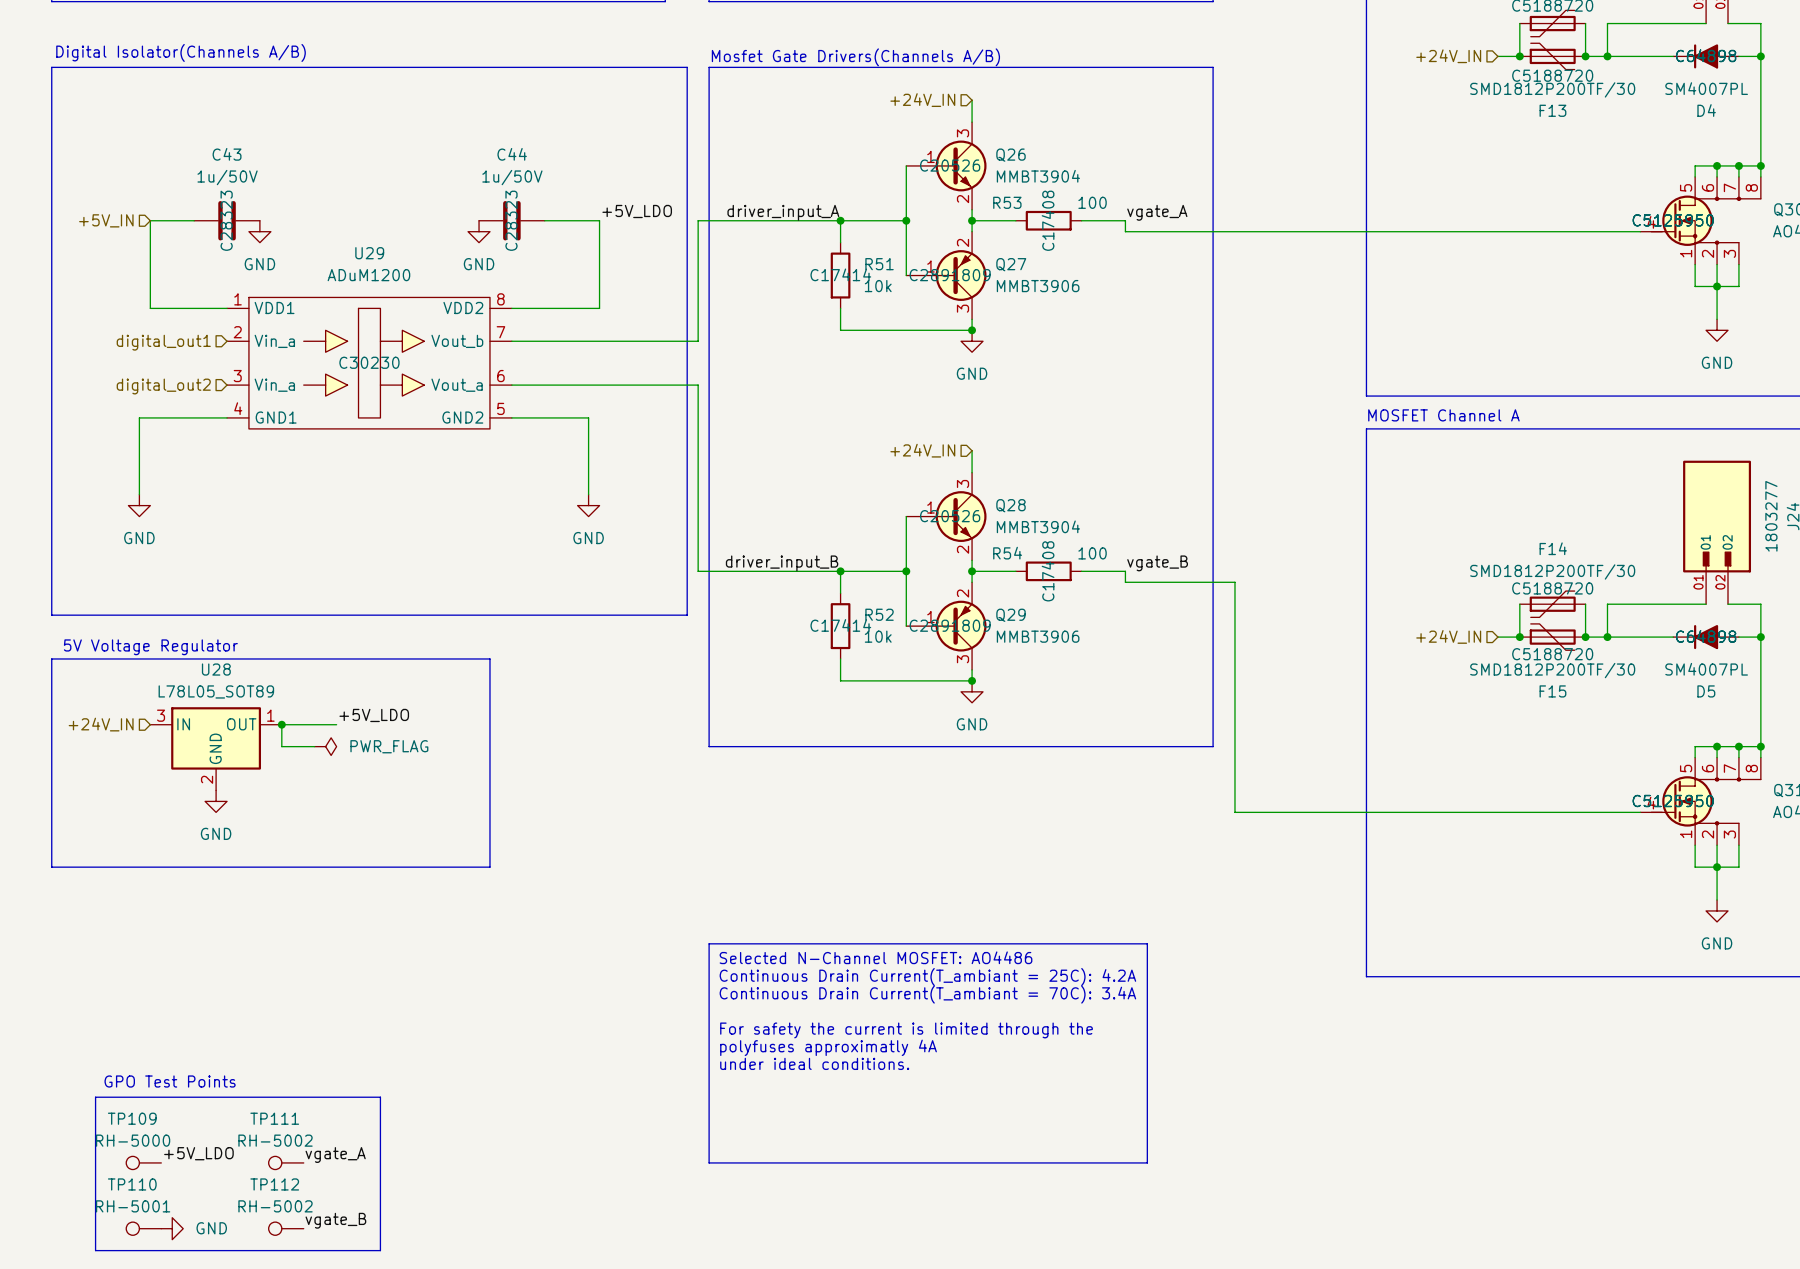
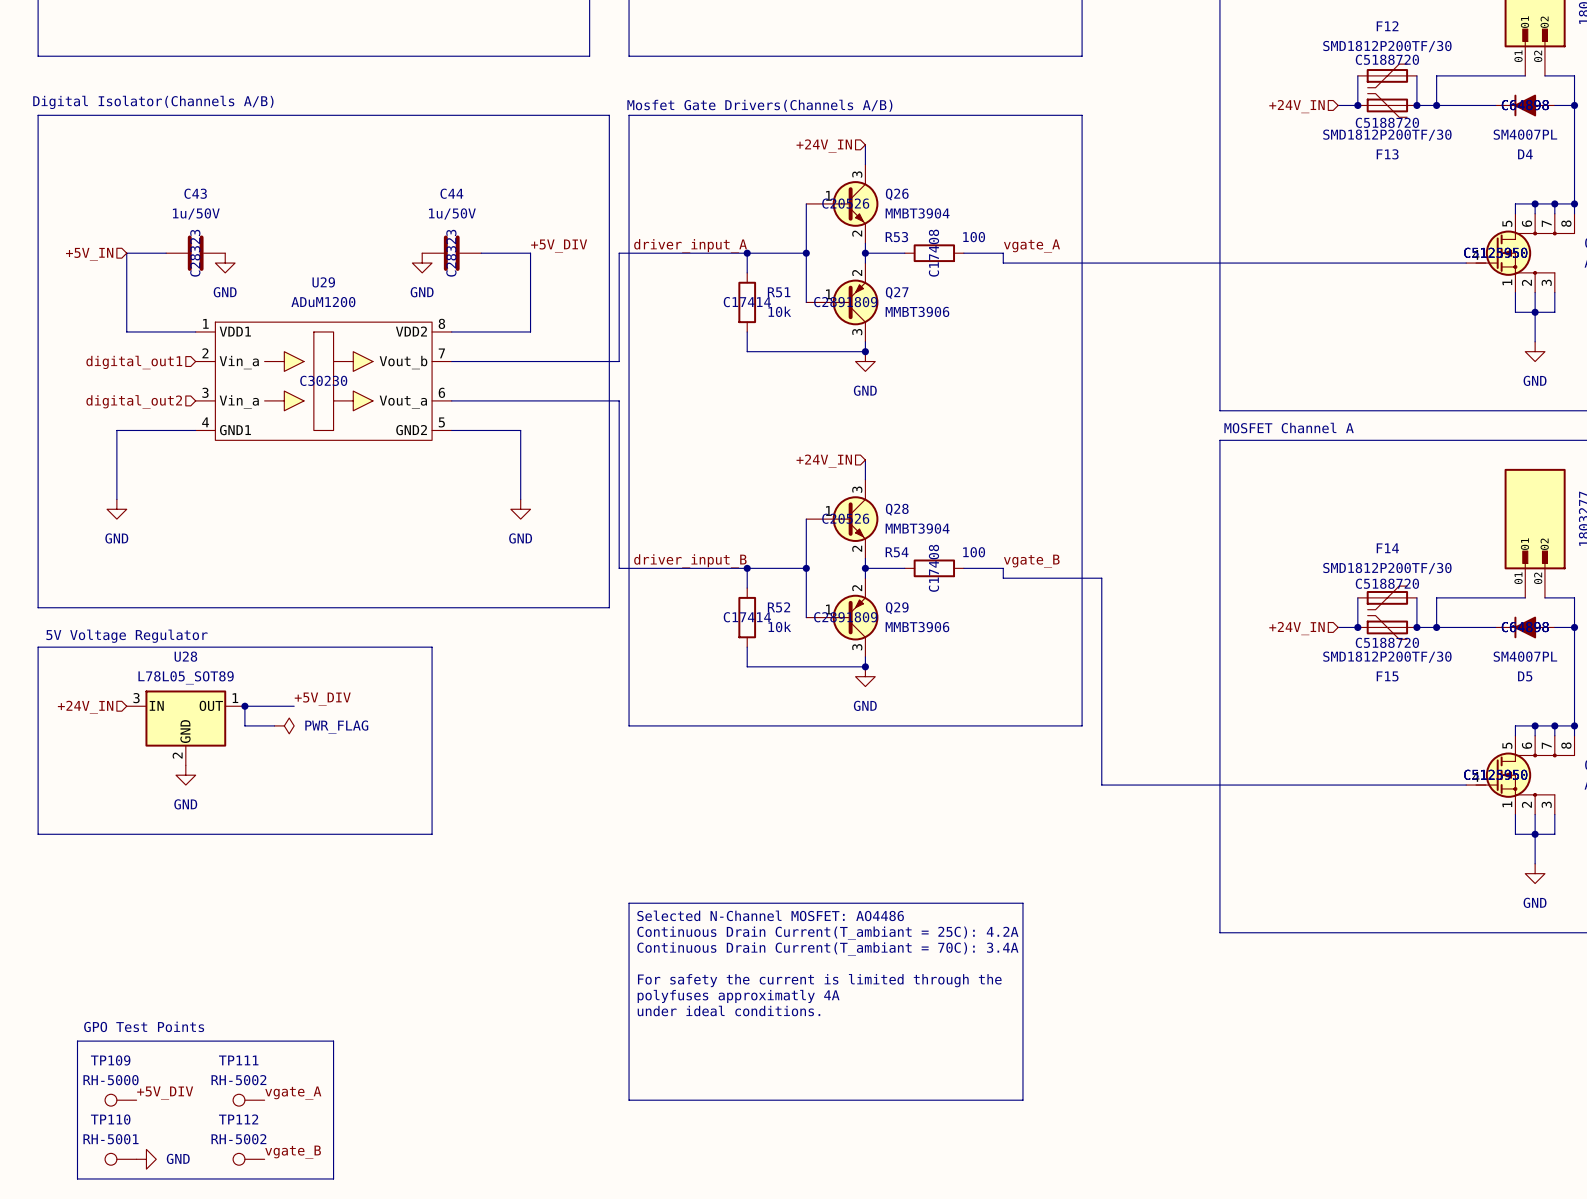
label: +5V_LDO (637, 211) -> +5V_DIV (559, 246)
label: +5V_LDO (374, 715) -> +5V_DIV (322, 699)
label: +5V_LDO (198, 1153) -> +5V_DIV (165, 1093)

